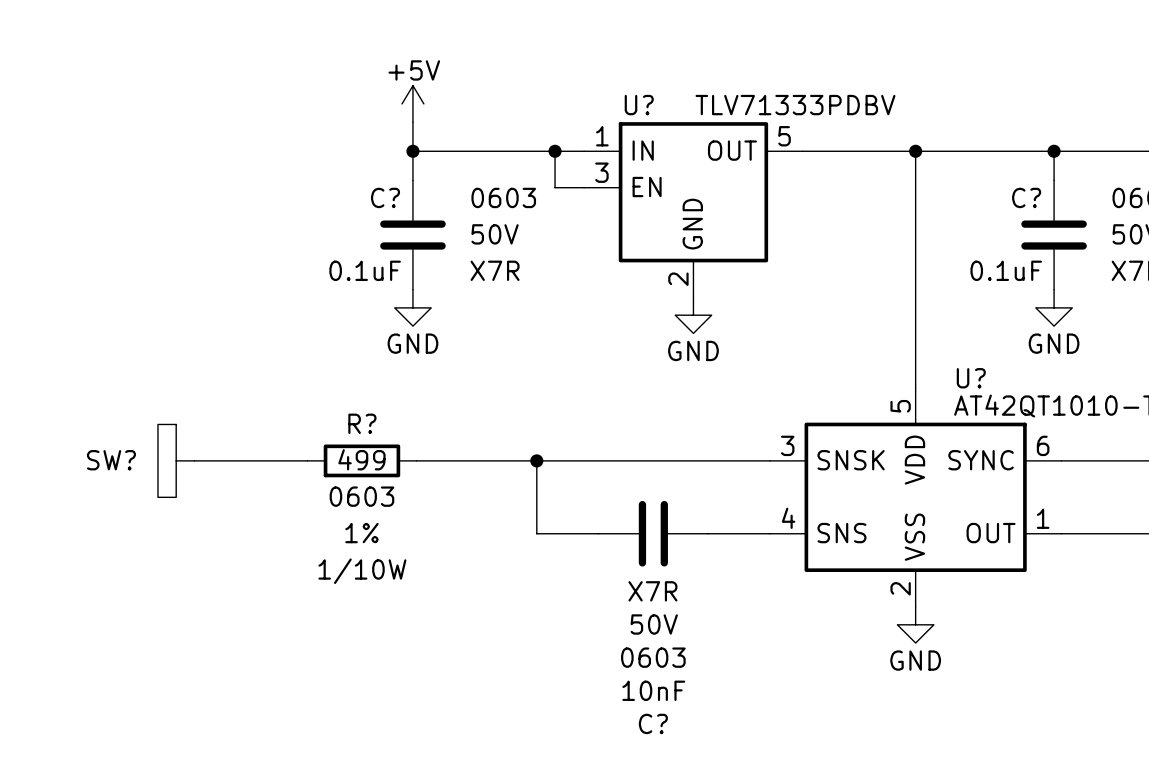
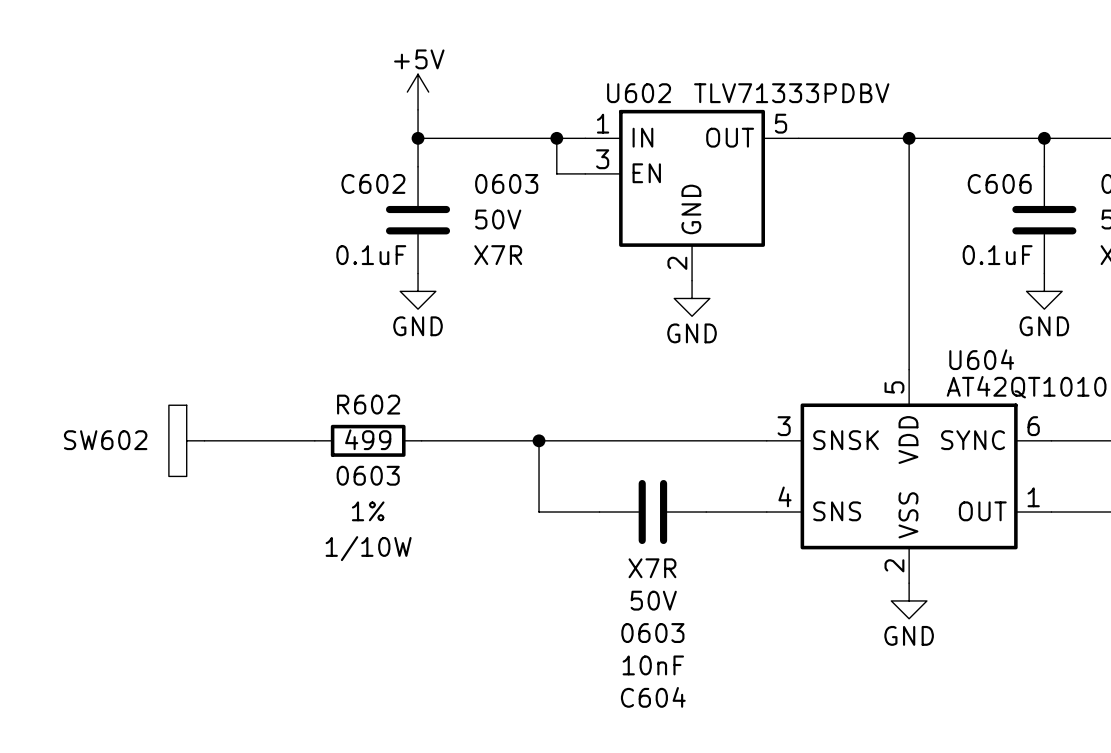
U? name: U? (639, 105) -> U602 (639, 93)
C? name: C? (385, 197) -> C602 (373, 183)
C? name: C? (1026, 197) -> C606 (999, 183)
U? name: U? (971, 378) -> U604 (981, 359)
R? name: R? (362, 423) -> R602 (368, 404)
SW? name: SW? (111, 460) -> SW602 (105, 440)
C? name: C? (653, 723) -> C604 (653, 697)

